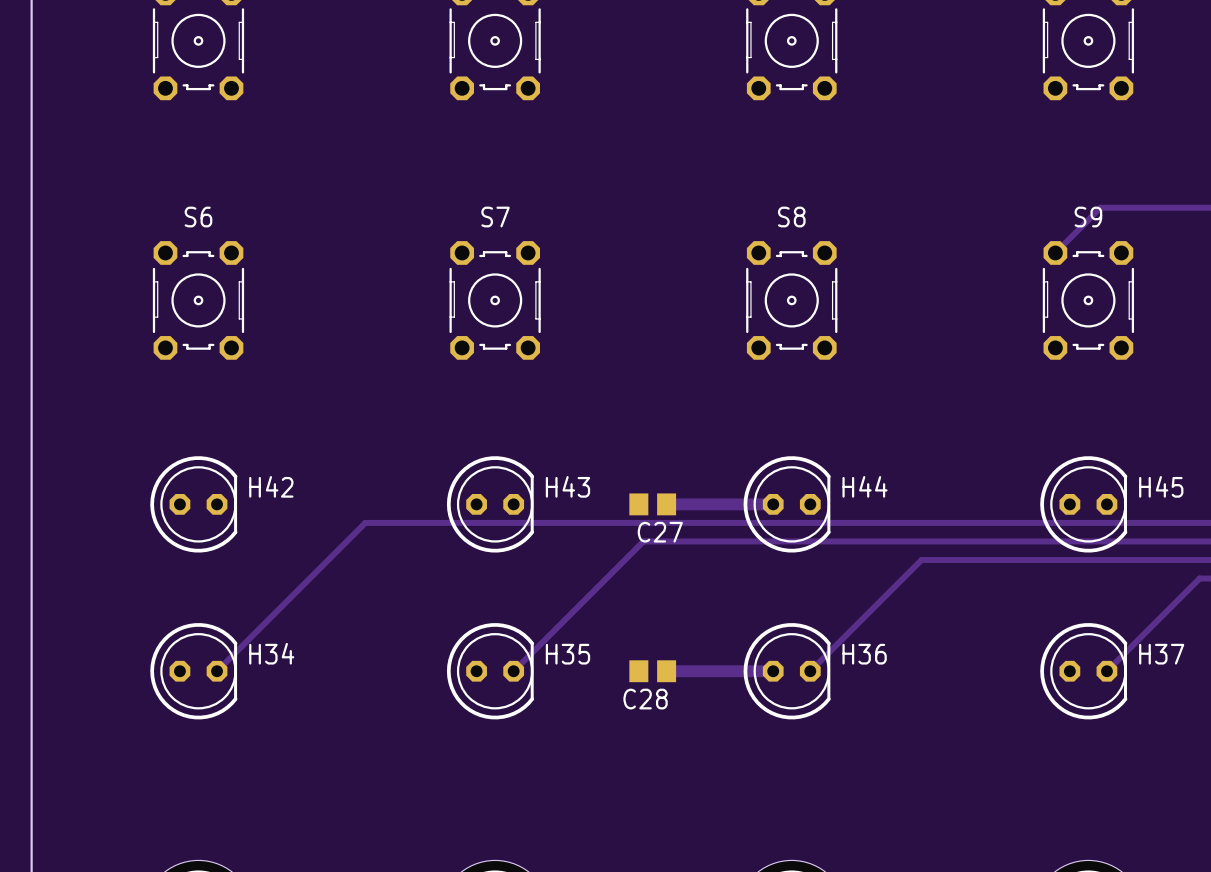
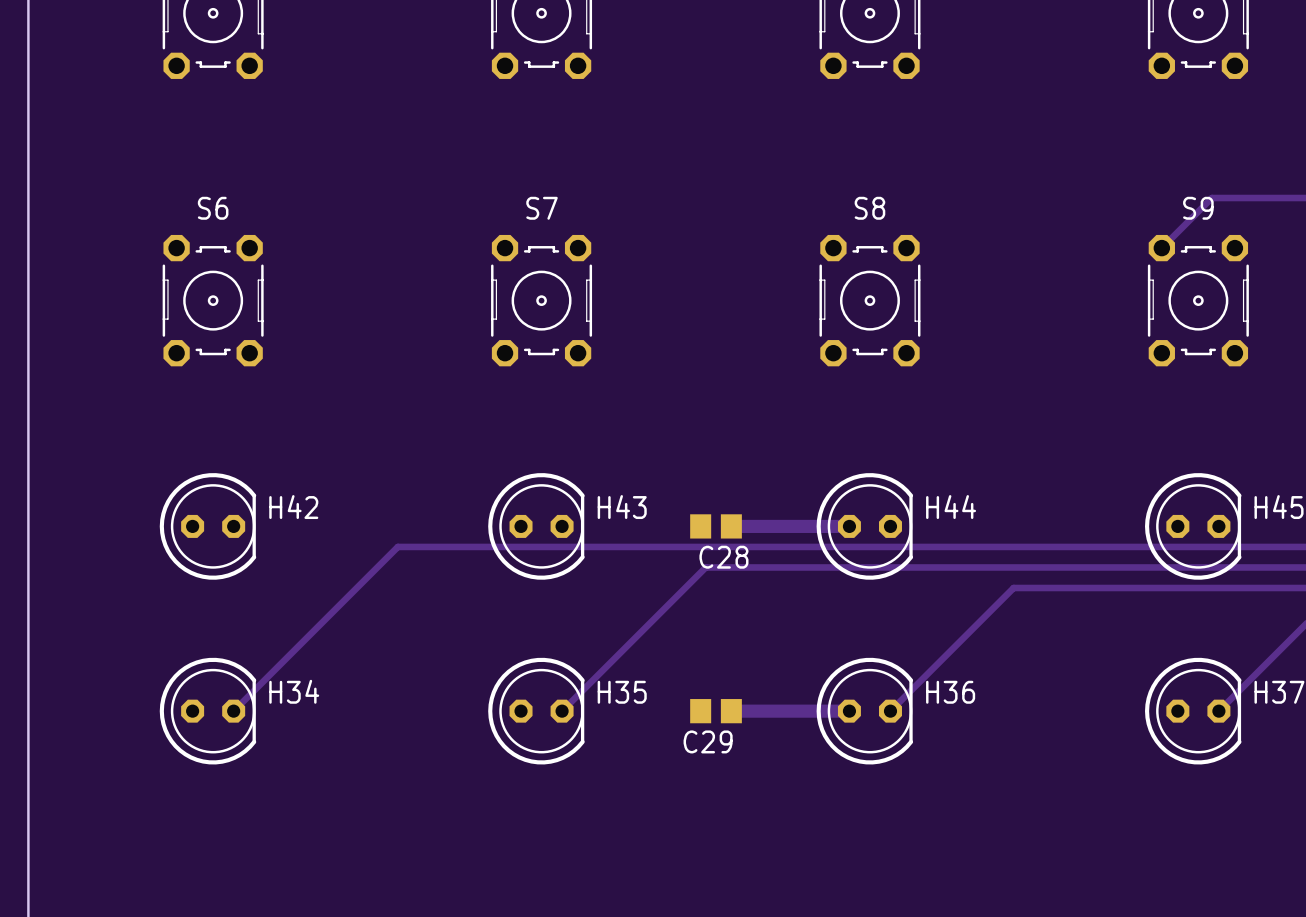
C27 name: C27 (660, 532) -> C28 (723, 557)
C28 name: C28 (645, 699) -> C29 (708, 741)

